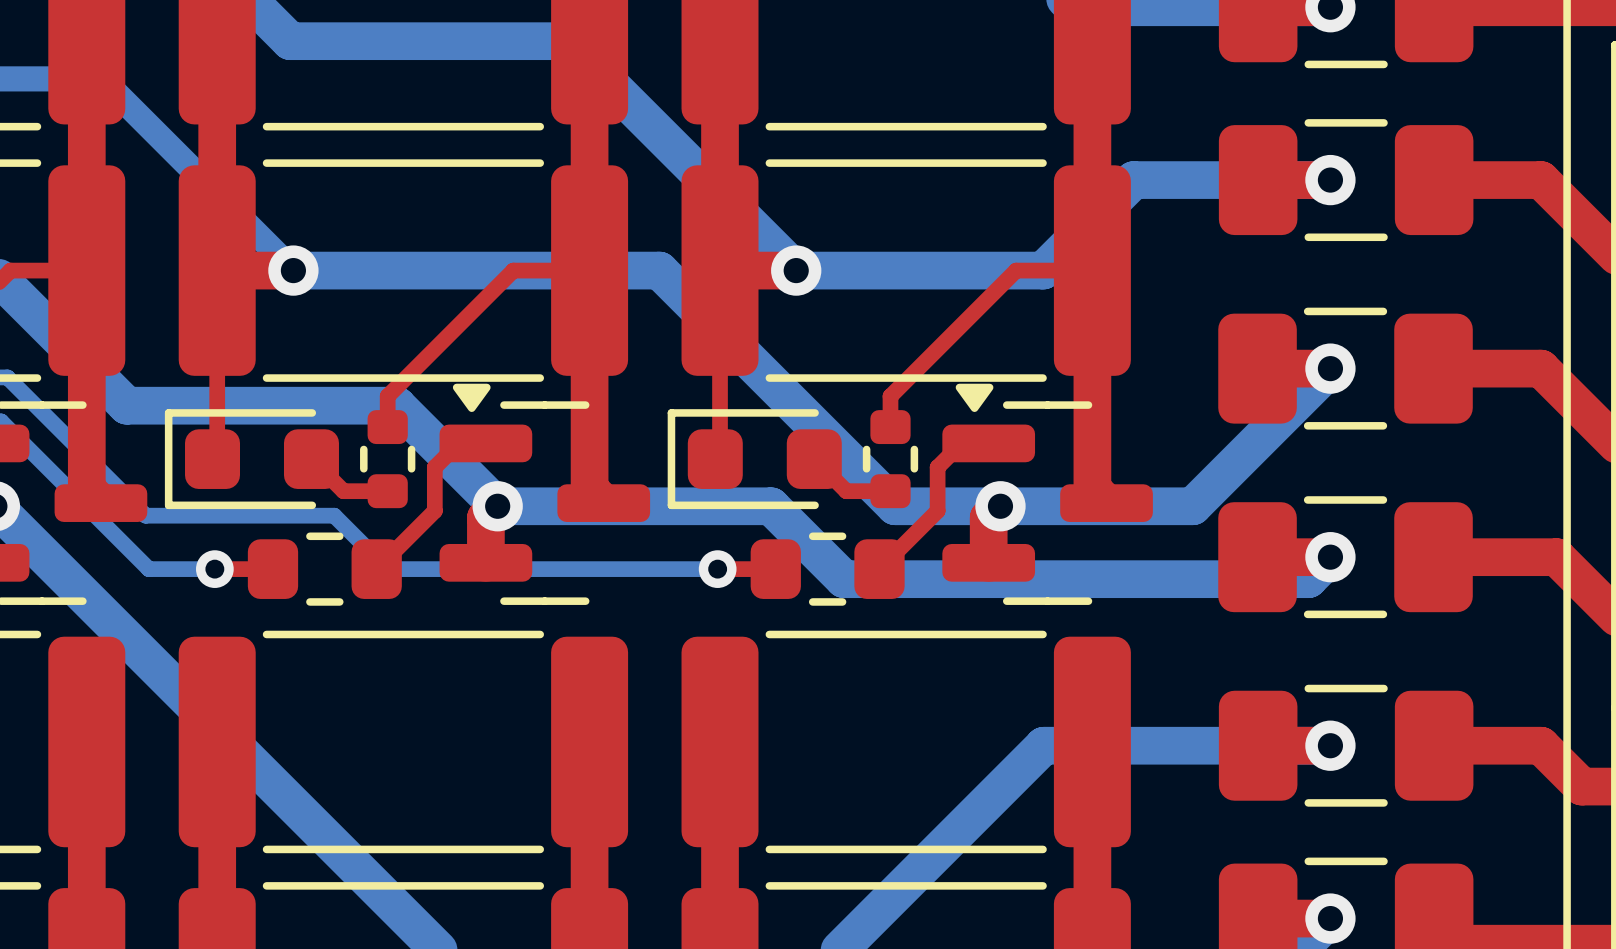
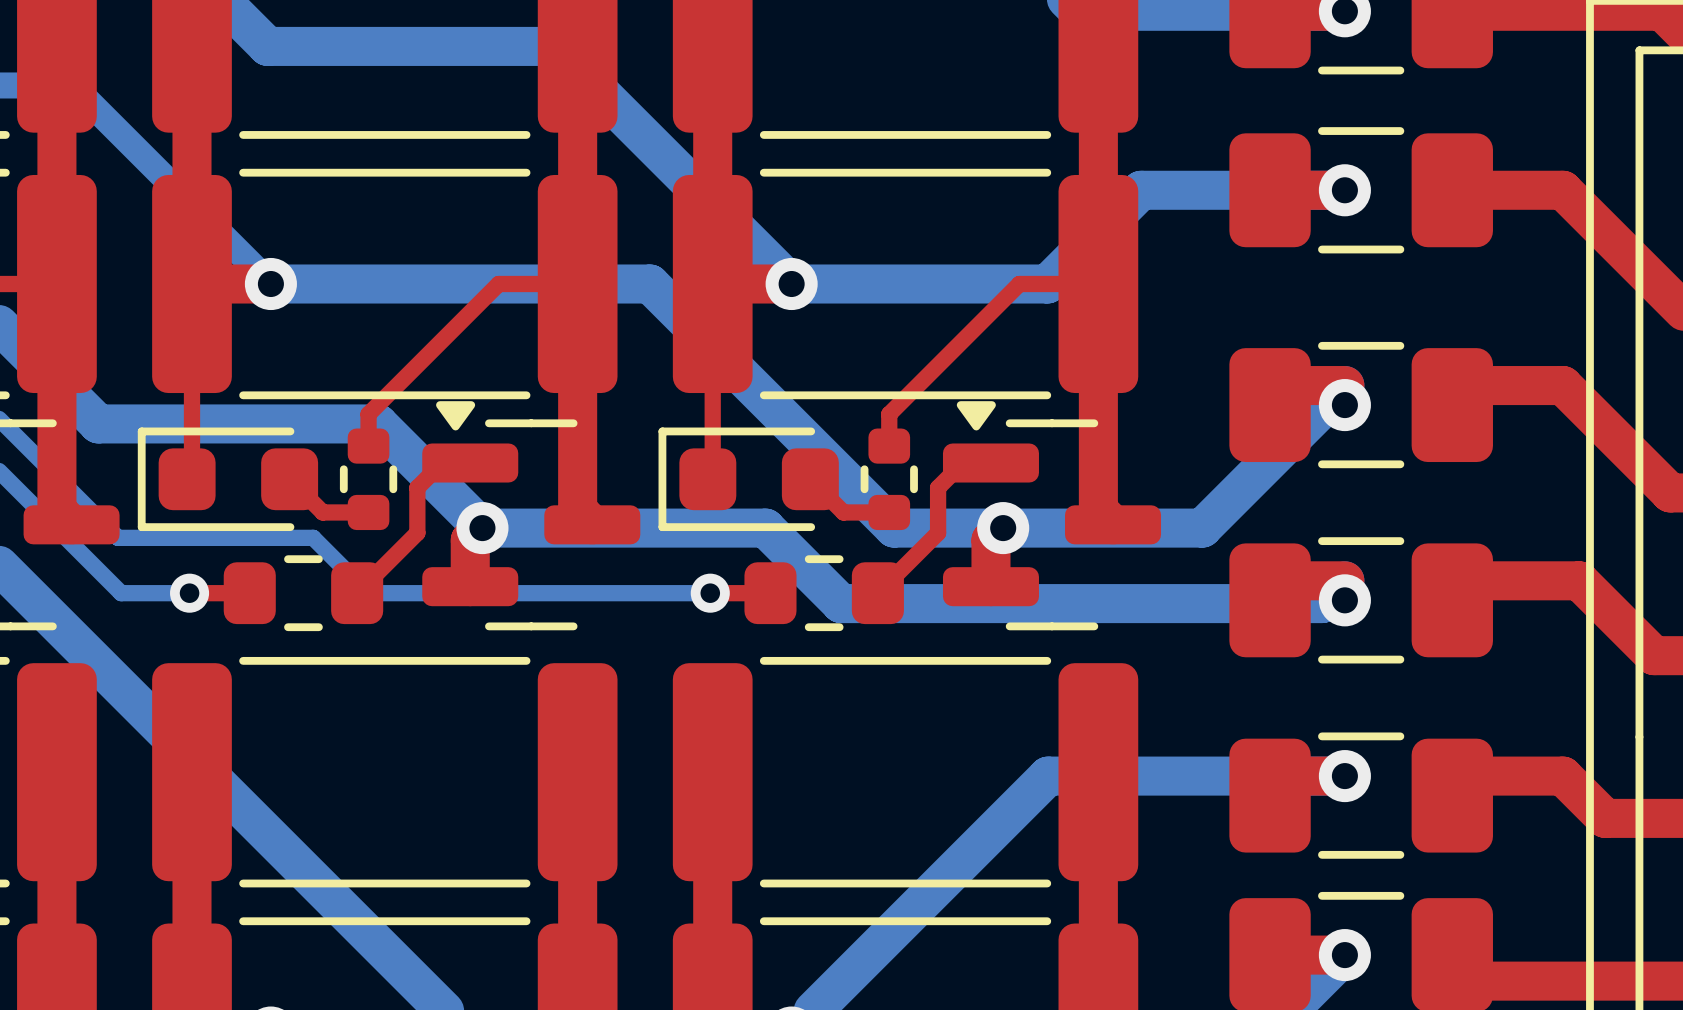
via position: (1330, 368) -> (1344, 405)
part position: (1345, 368) -> (1361, 405)
via position: (1330, 557) -> (1344, 600)
part position: (1345, 557) -> (1361, 600)
part position: (1346, 745) -> (1361, 795)

